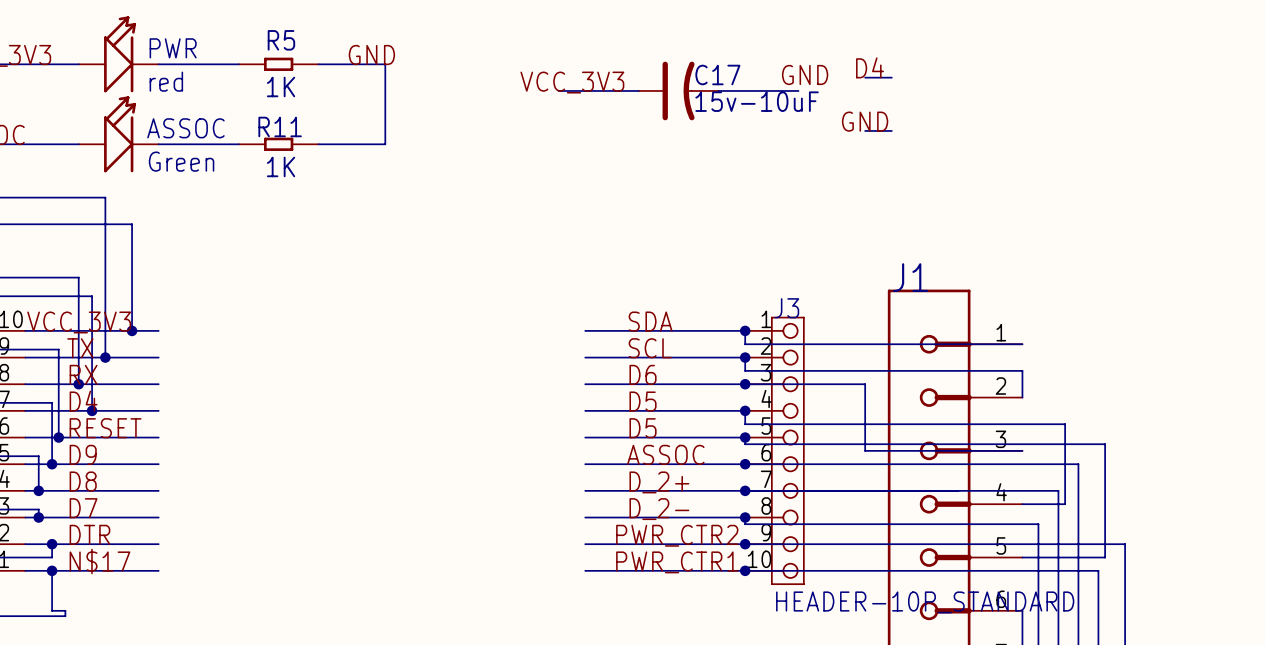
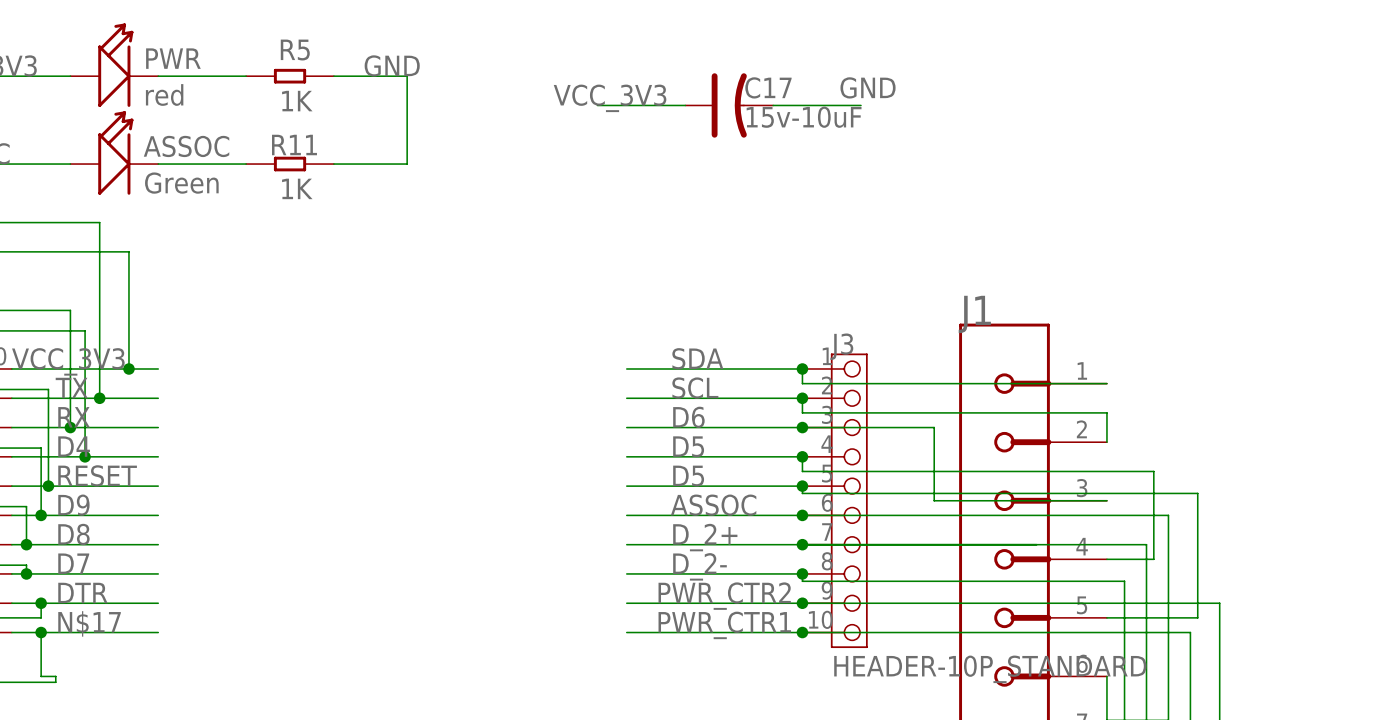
label: D4 (870, 67) -> none
wire: (865, 77) (891, 77) -> none
label: GND (865, 121) -> none
wire: (865, 130) (891, 130) -> none

